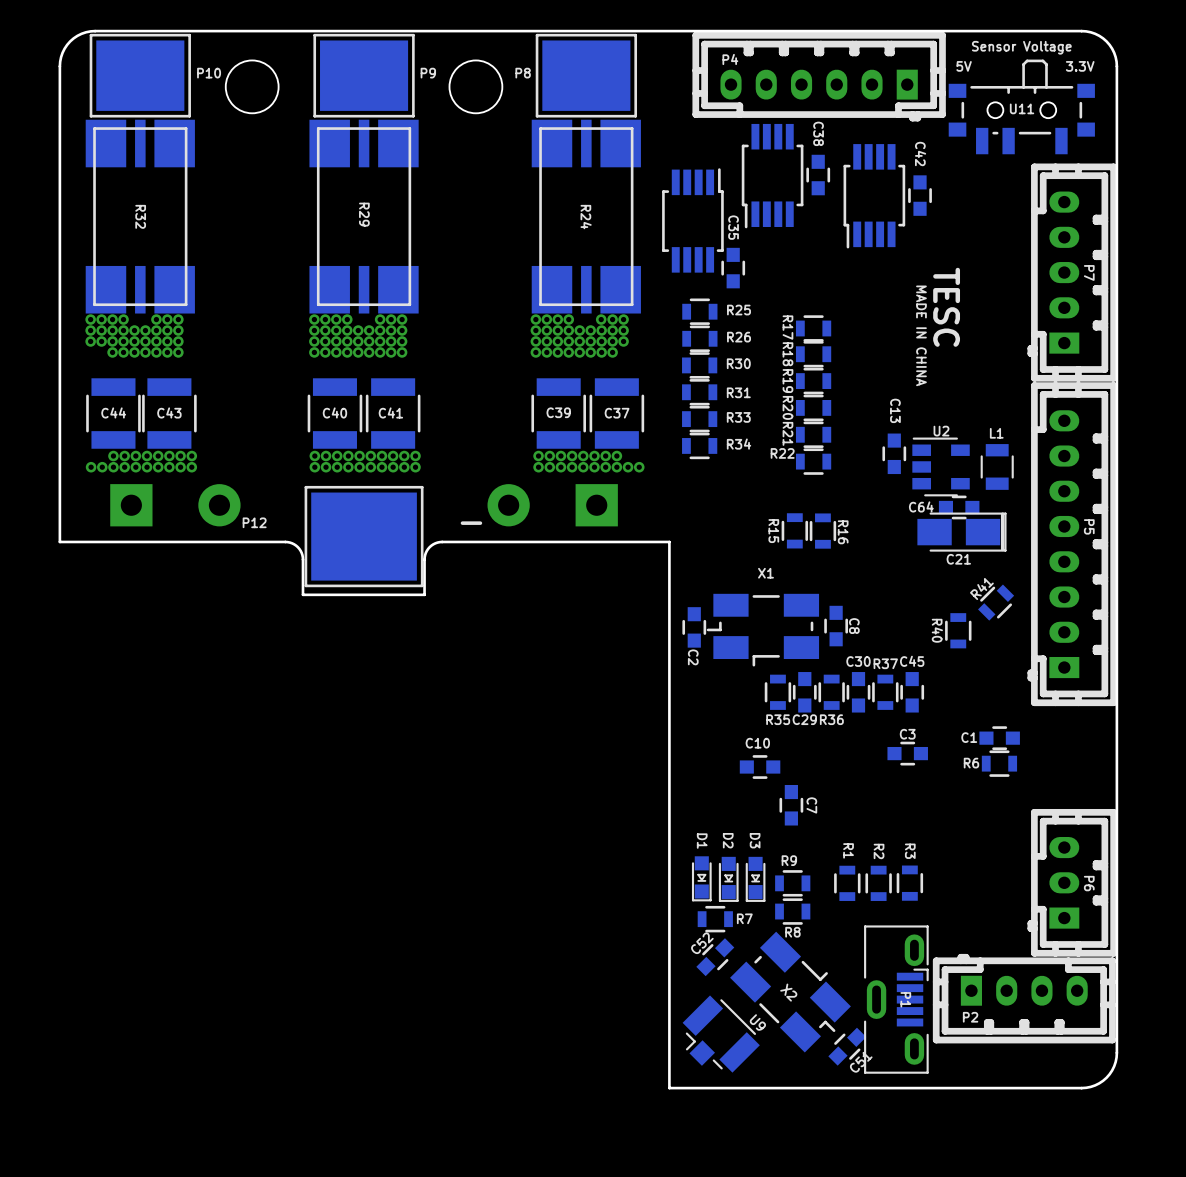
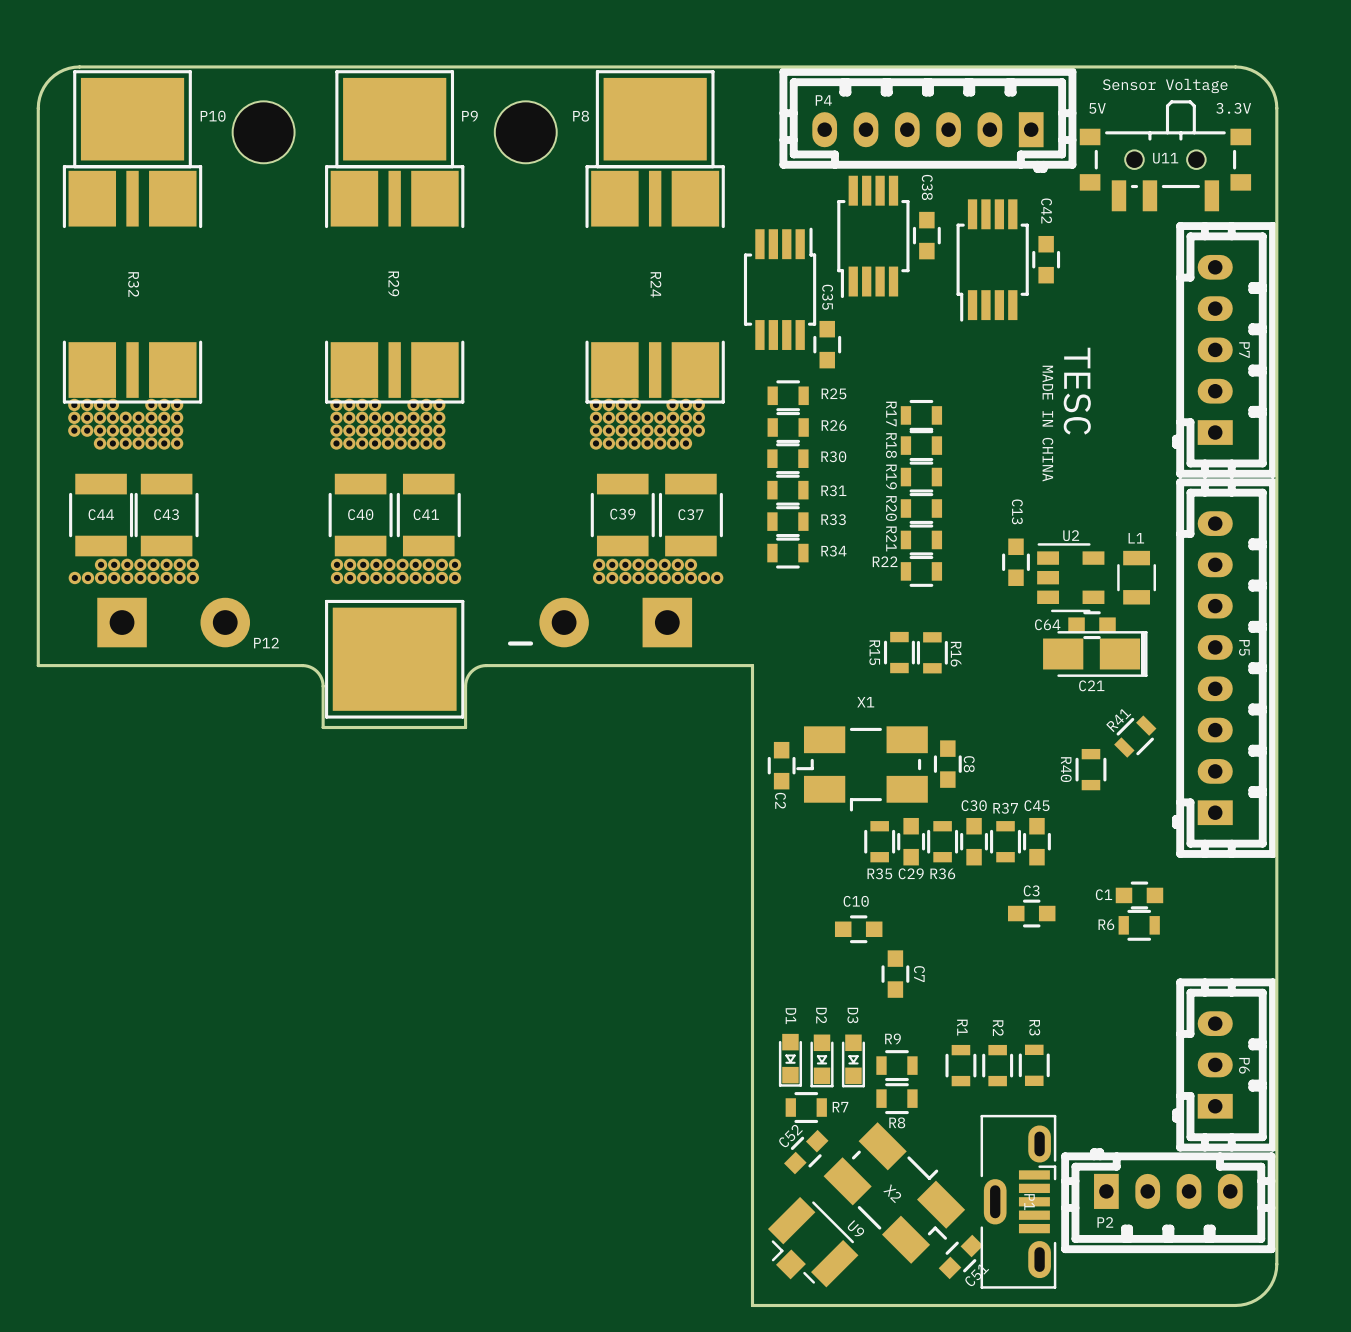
R32 footprint: [85, 119, 195, 314] -> [62, 165, 203, 404]
R29 footprint: [309, 119, 419, 314] -> [325, 165, 465, 404]
R24 footprint: [531, 119, 641, 314] -> [585, 165, 725, 404]

